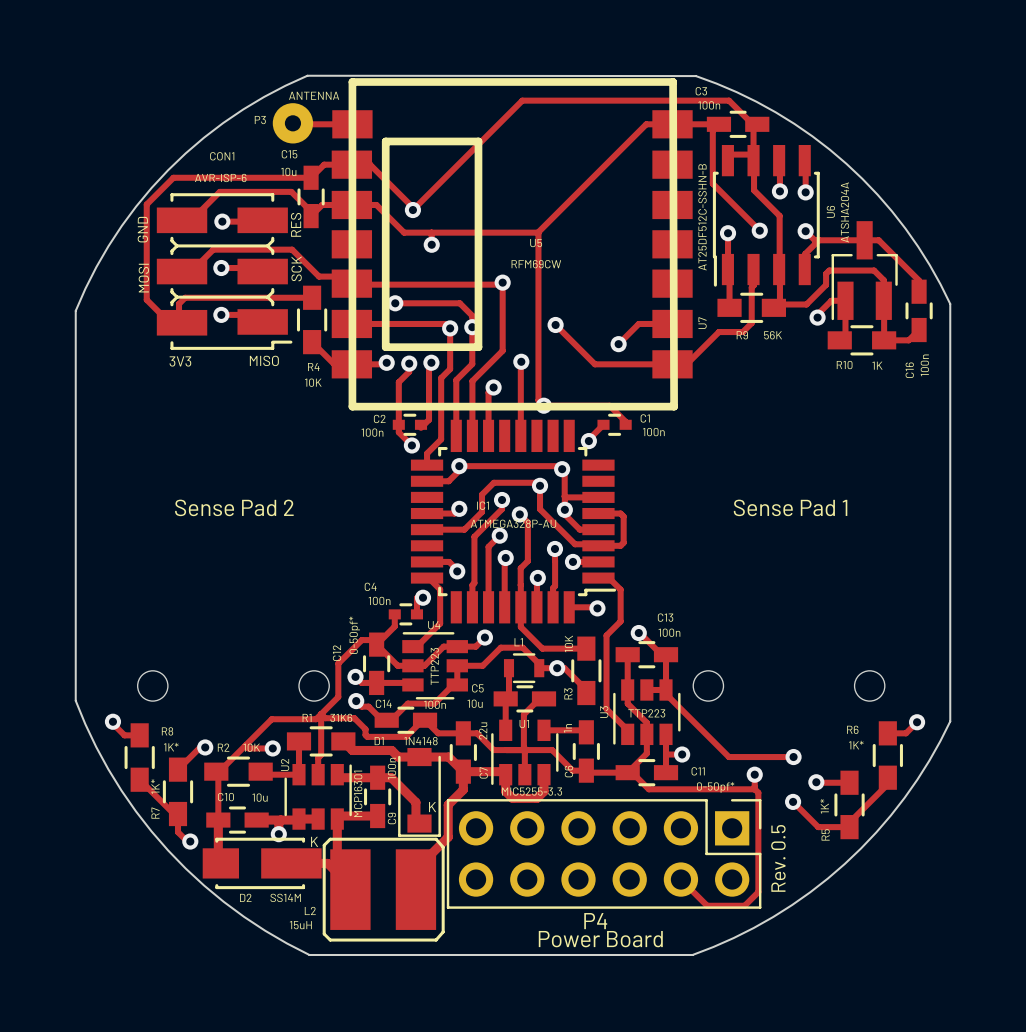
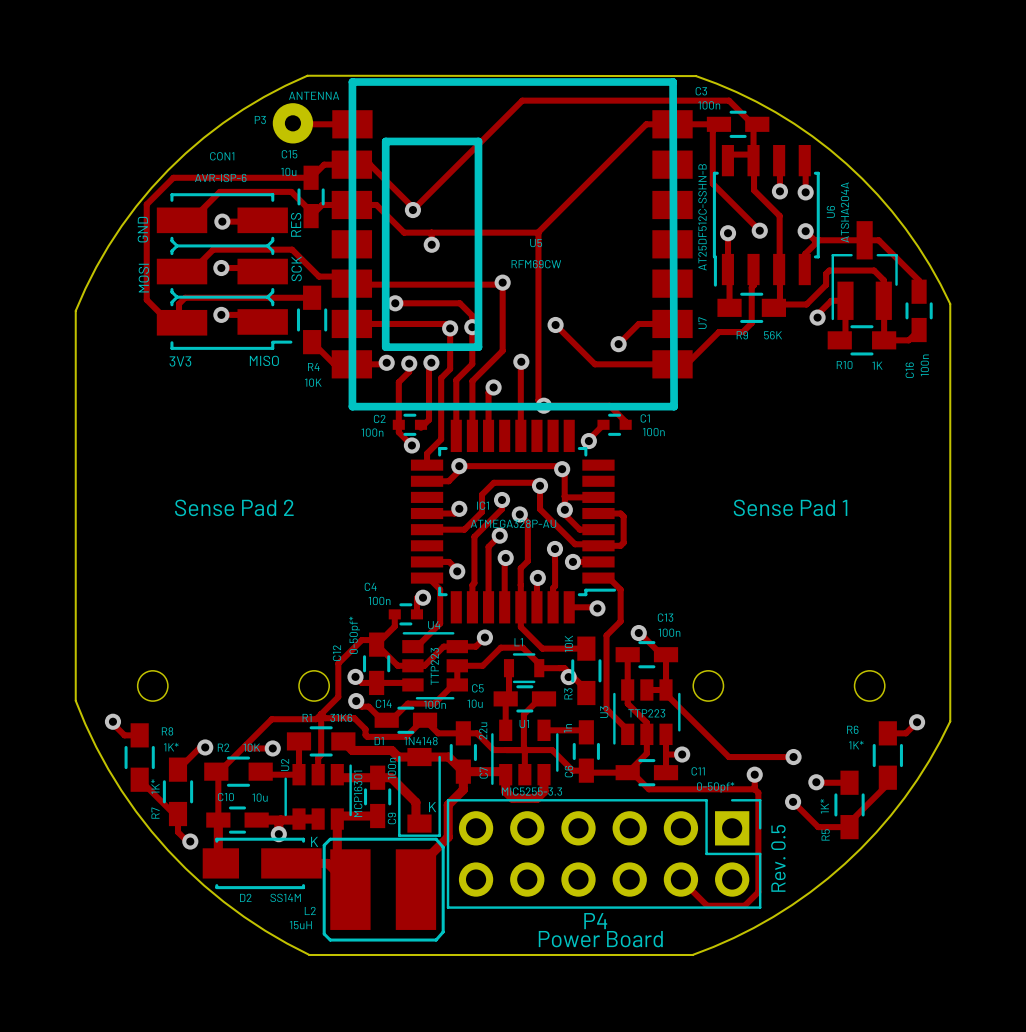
via position: (557, 668) -> (568, 677)

